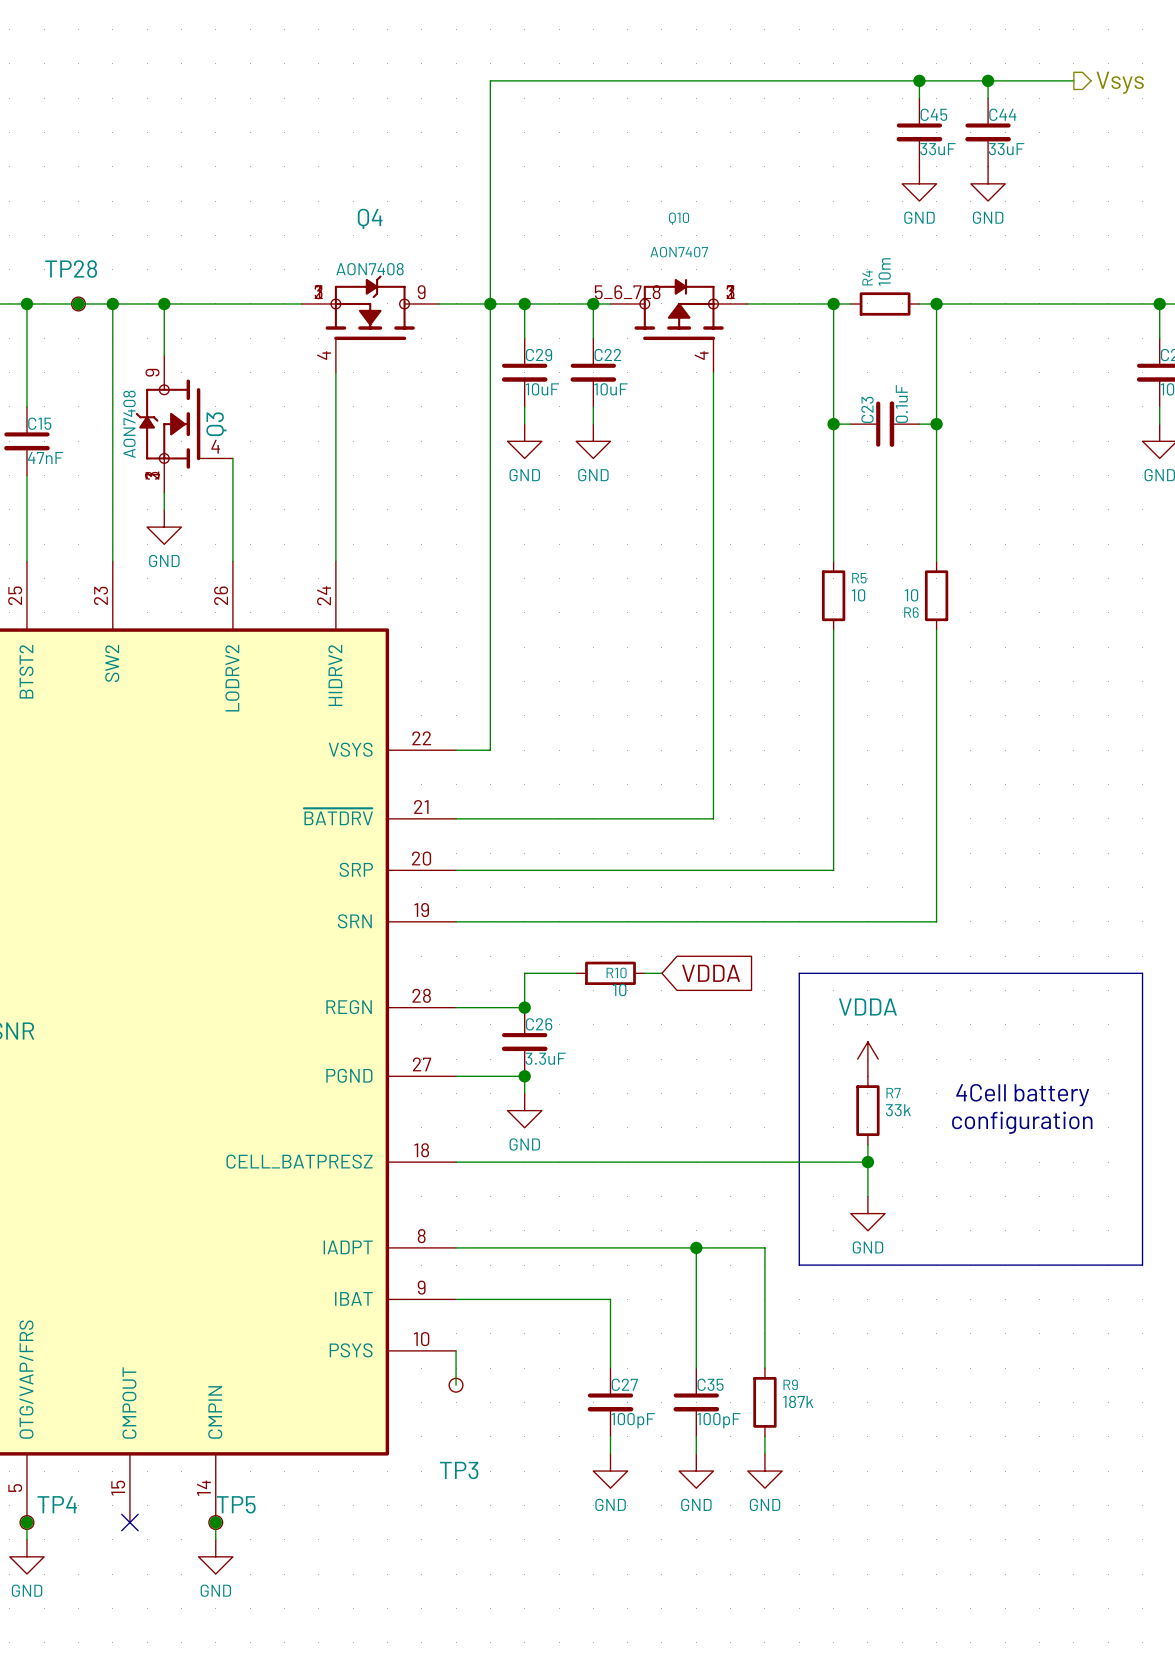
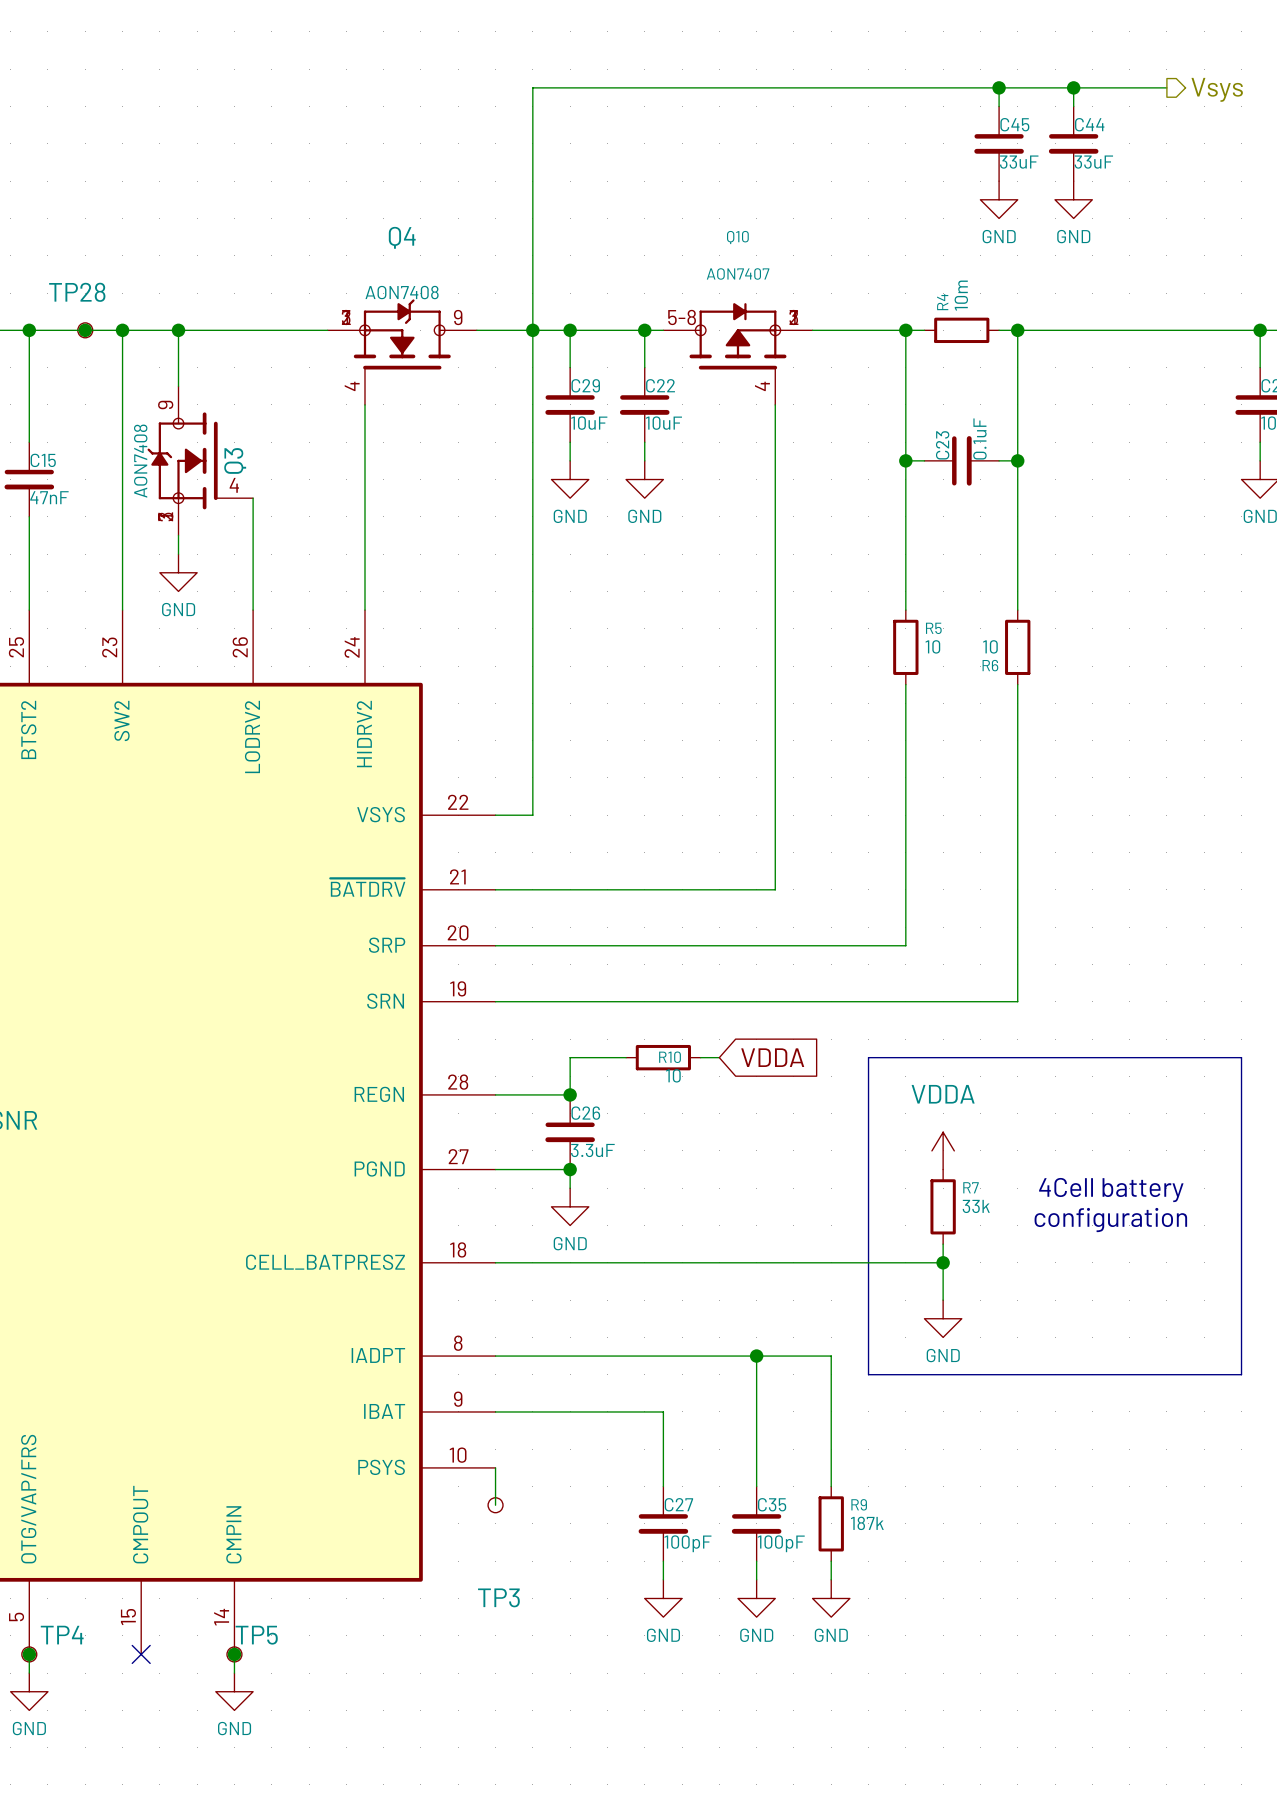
Q10 pin number: 5_6_7_8 (627, 292) -> 5-8 (682, 317)

